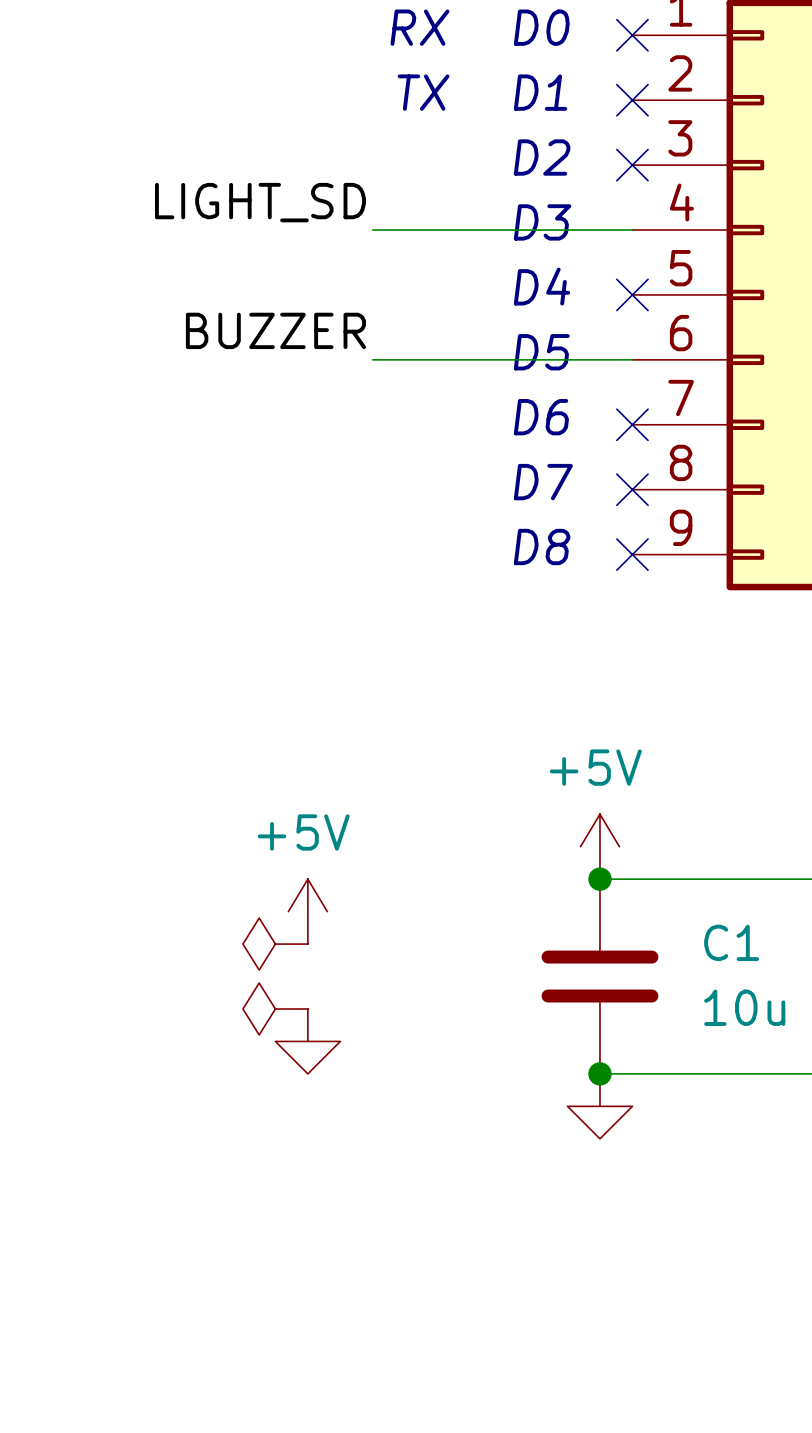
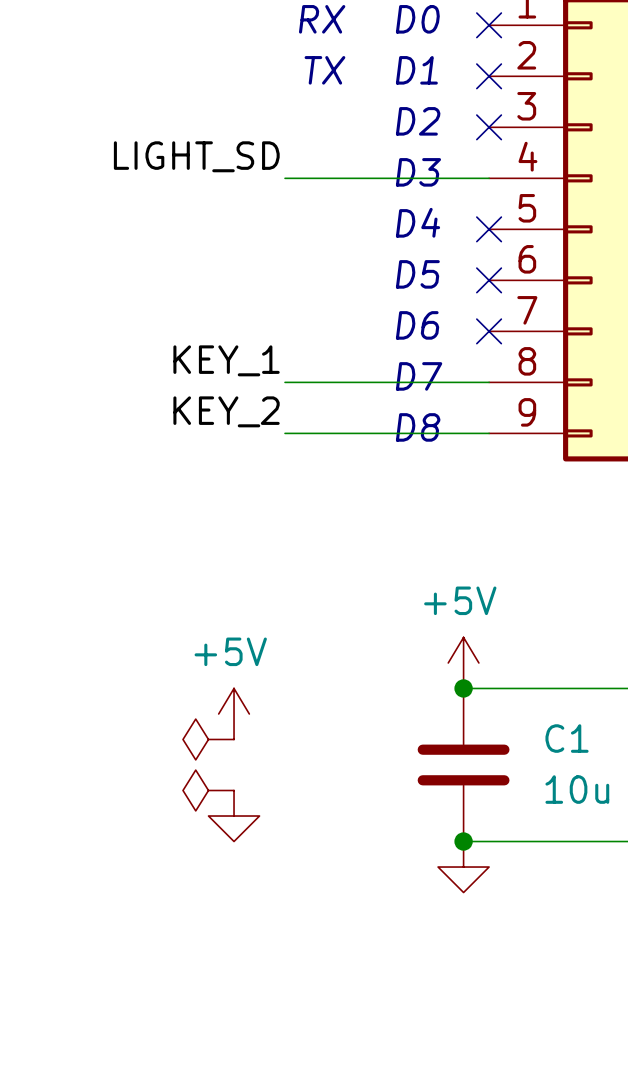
label: BUZZER (275, 330) -> none
wire: (372, 359) (632, 359) -> (285, 382) (489, 382)
no-connect mark: none -> (489, 280)
label: none -> KEY_1 (226, 360)
no-connect mark: (632, 489) -> none
label: none -> KEY_2 (226, 411)
wire: none -> (285, 433) (489, 433)
no-connect mark: (632, 554) -> none

